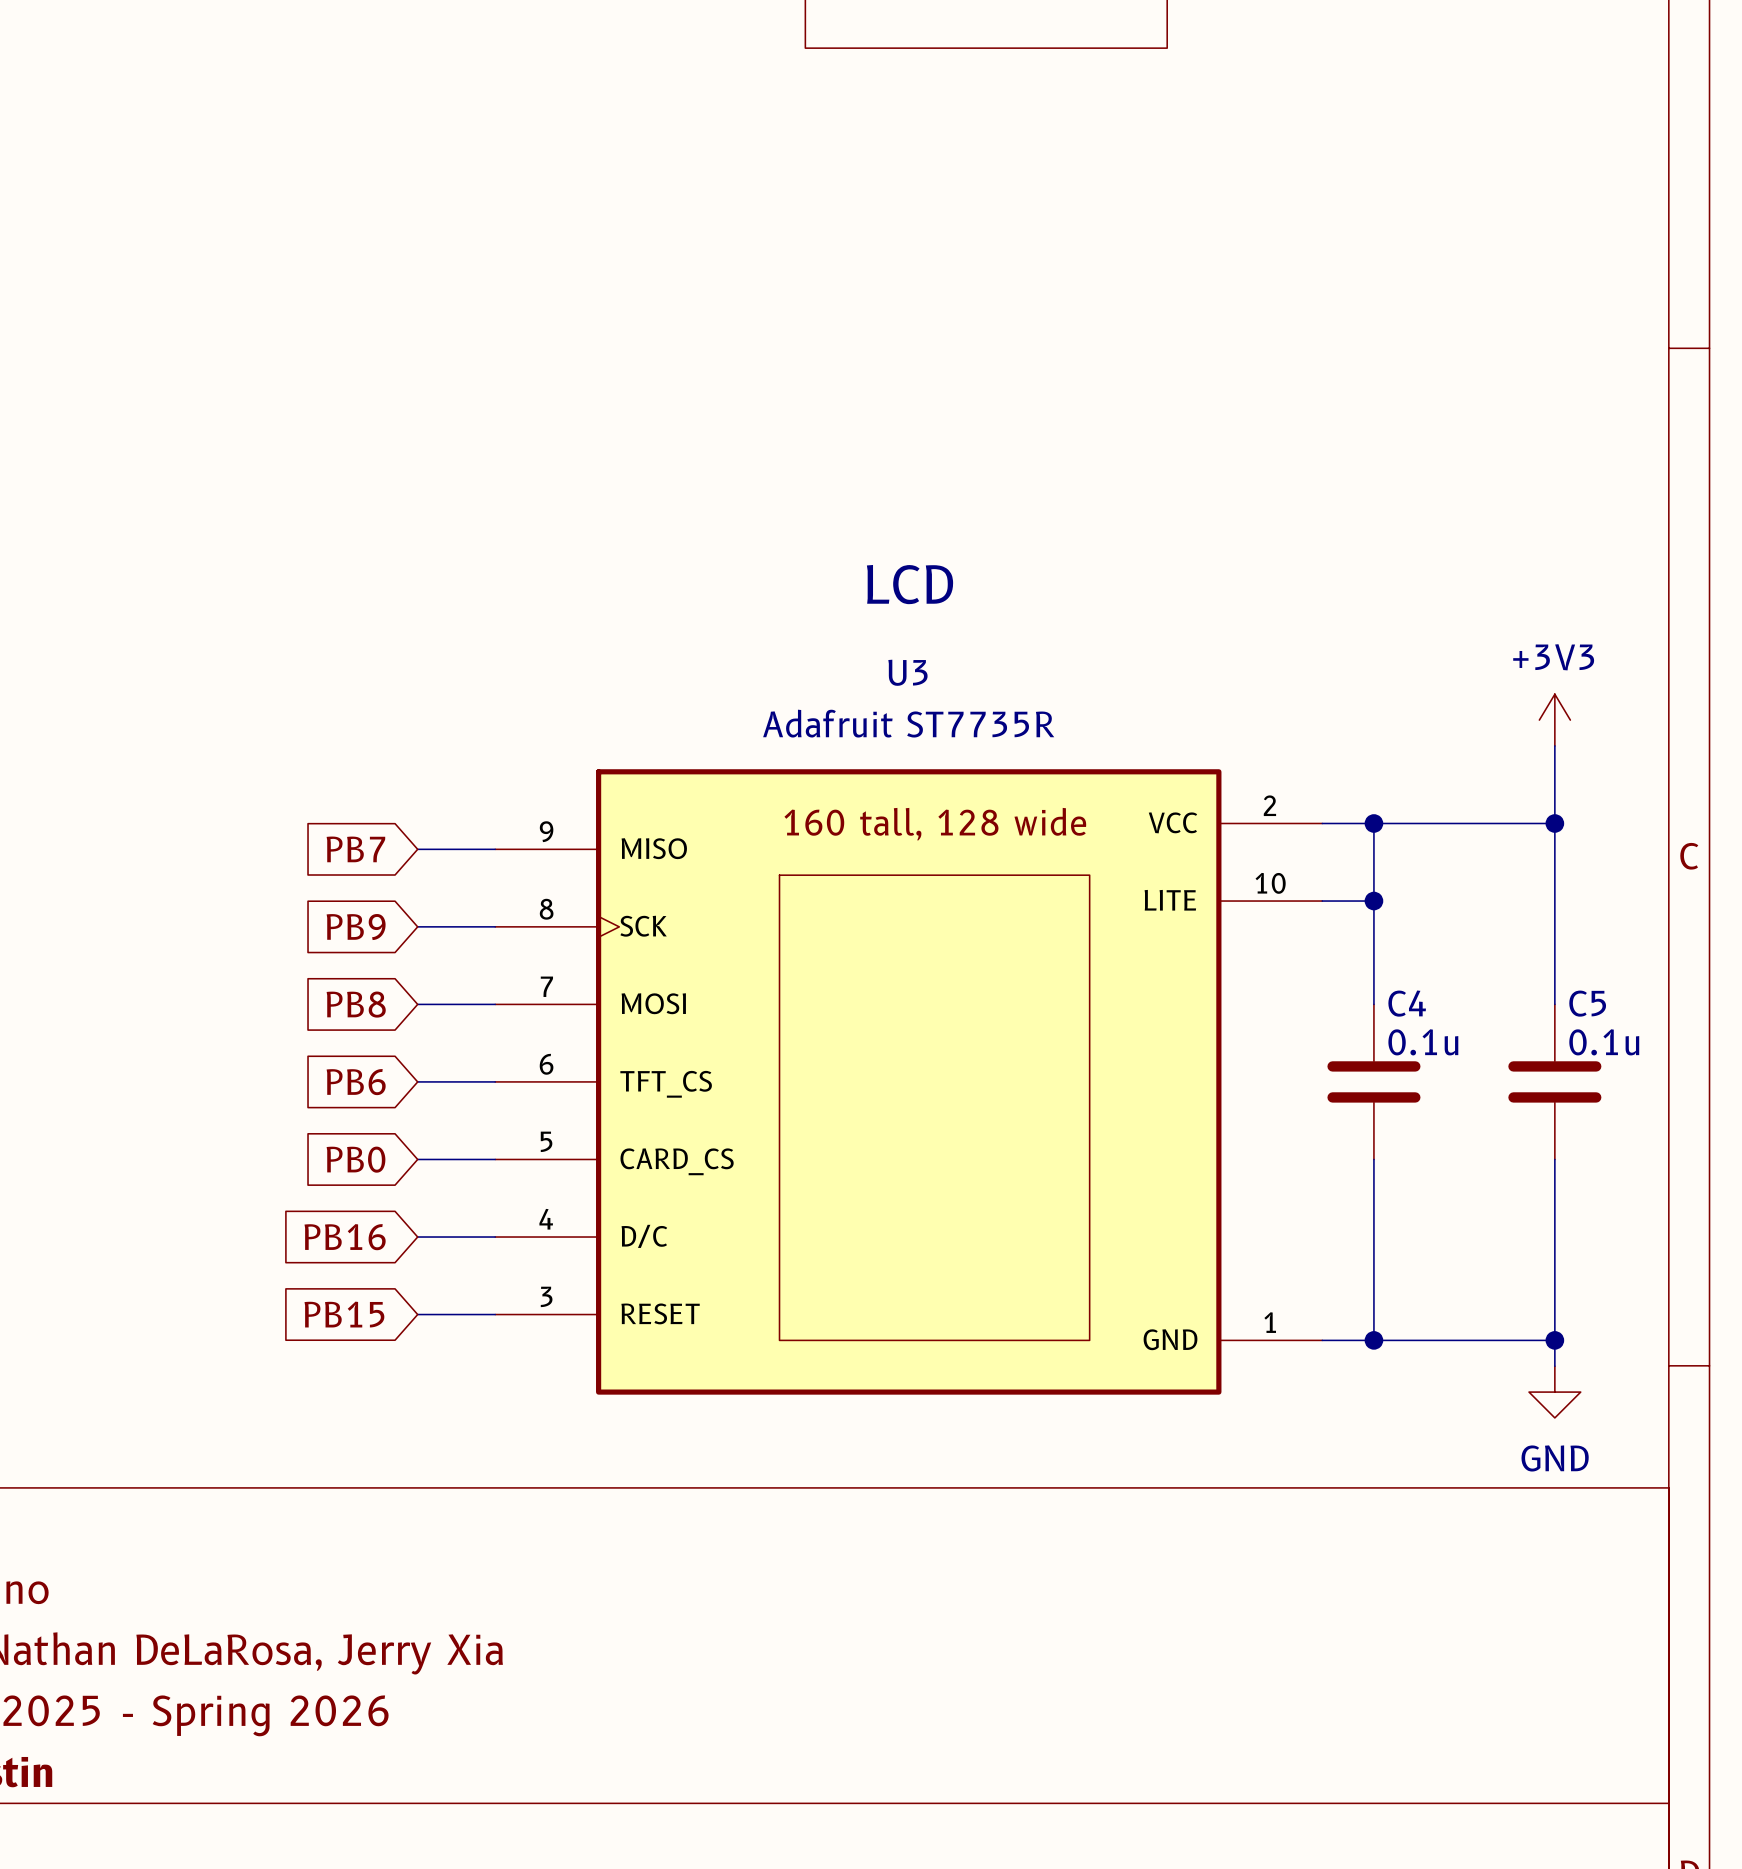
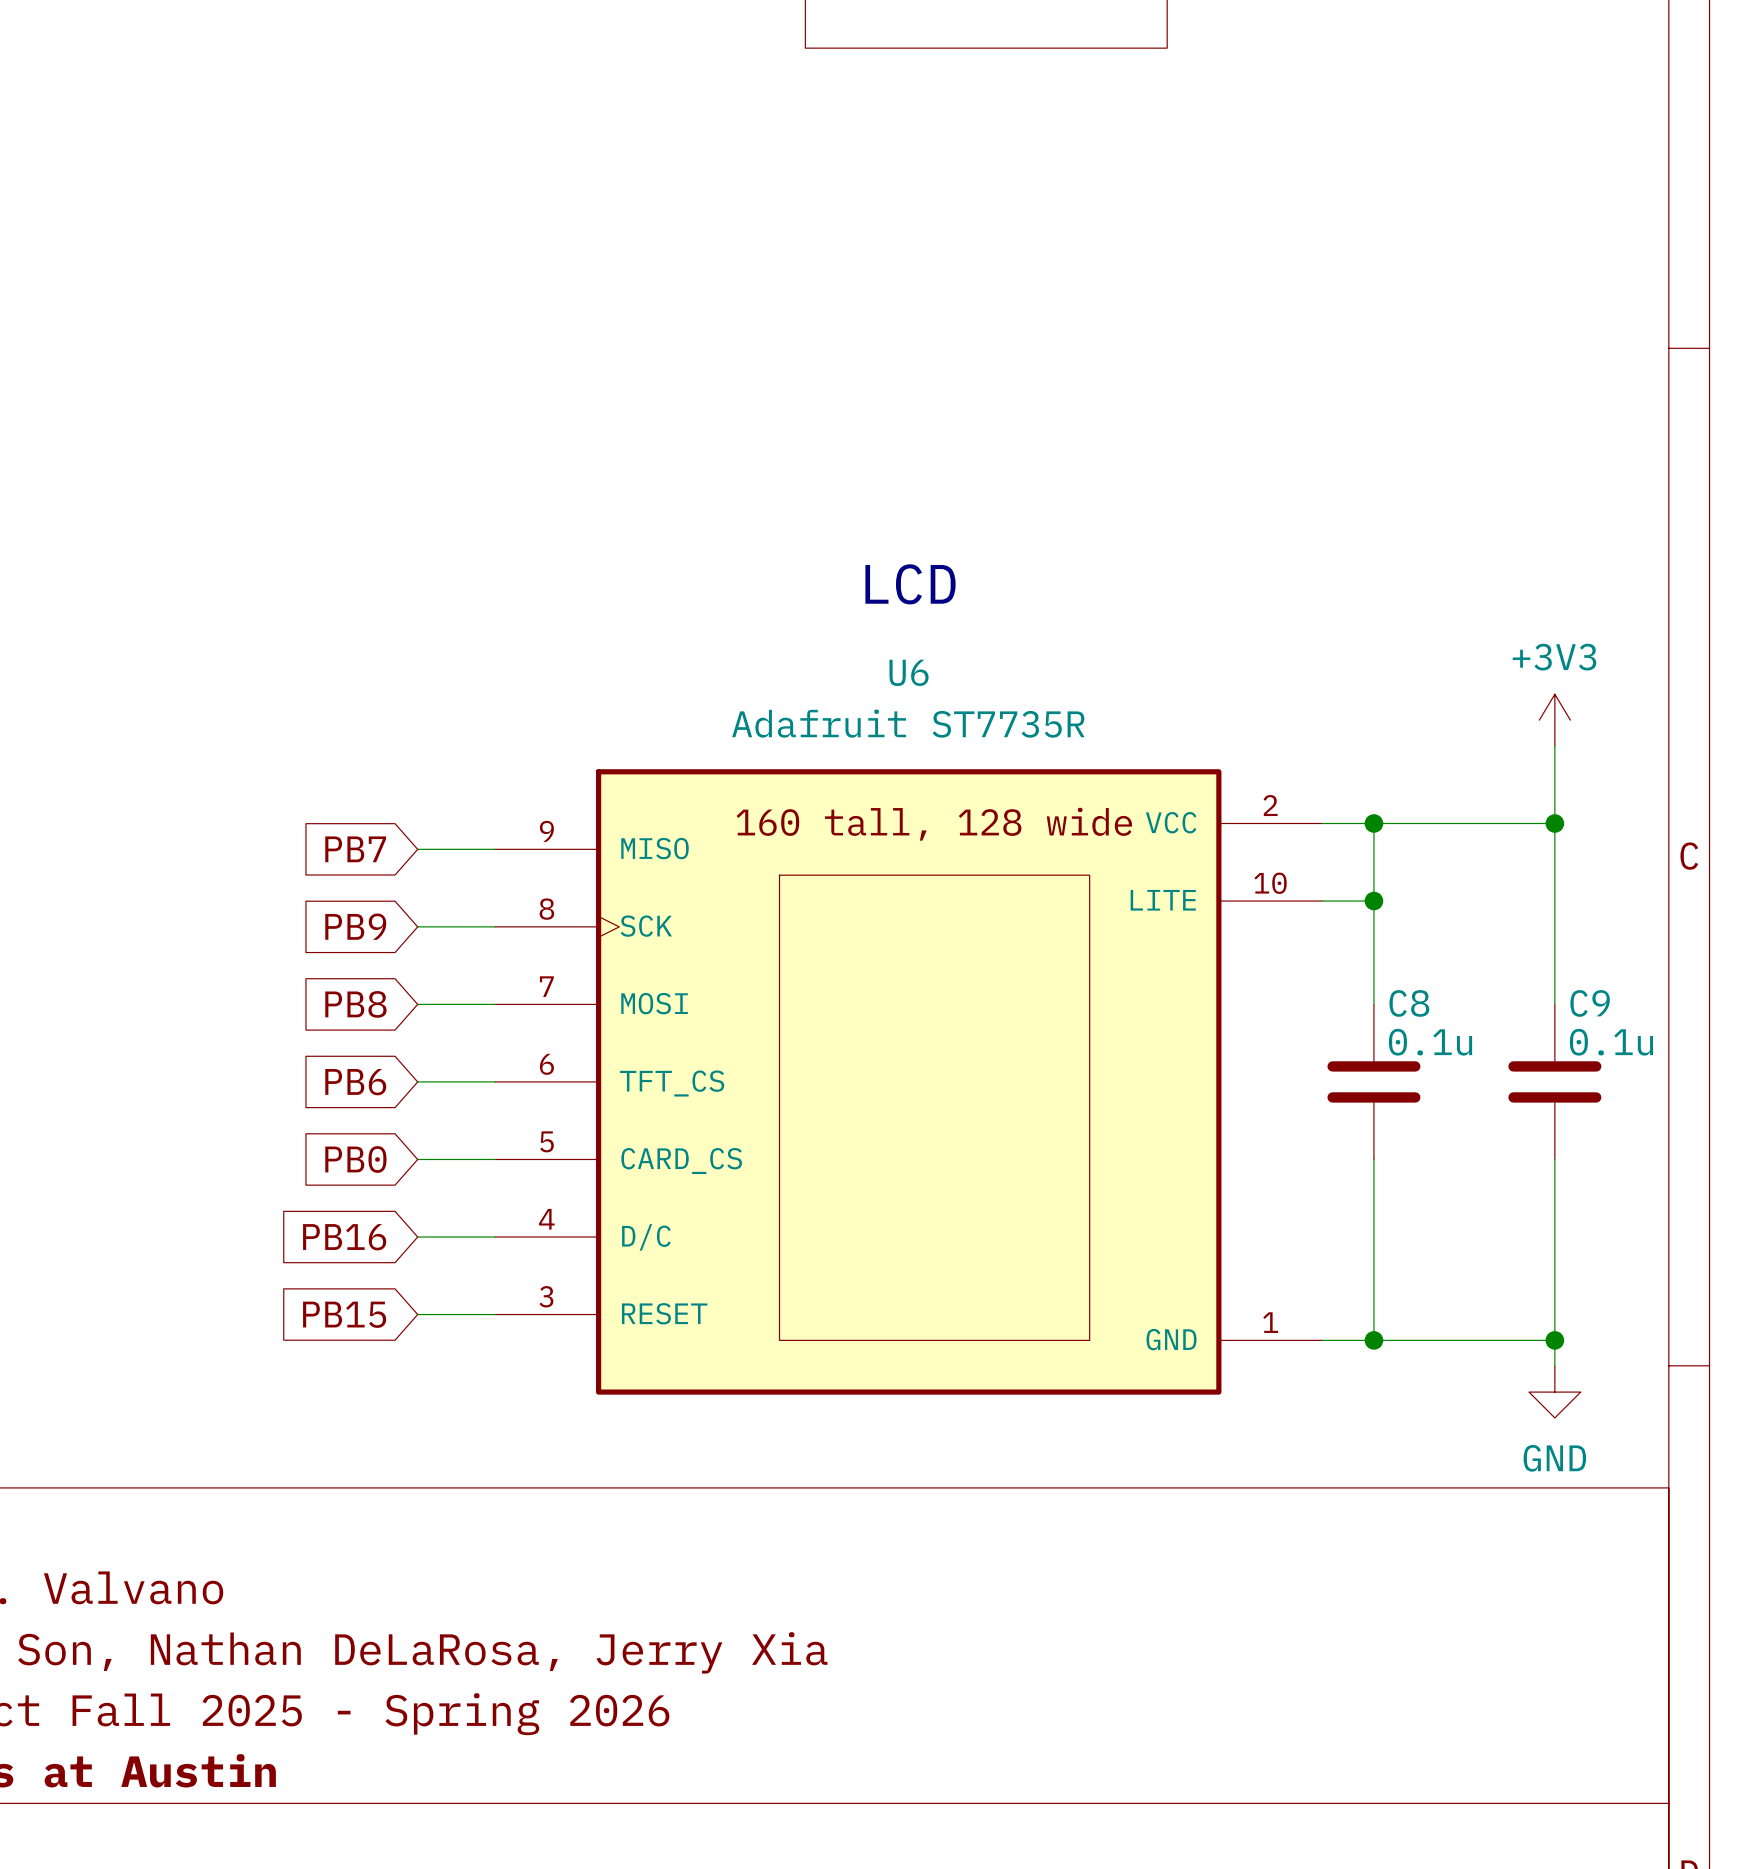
U3 name: U3 (907, 672) -> U6 (909, 672)
C4 name: C4 (1407, 1003) -> C8 (1409, 1003)
C5 name: C5 (1587, 1003) -> C9 (1590, 1003)

